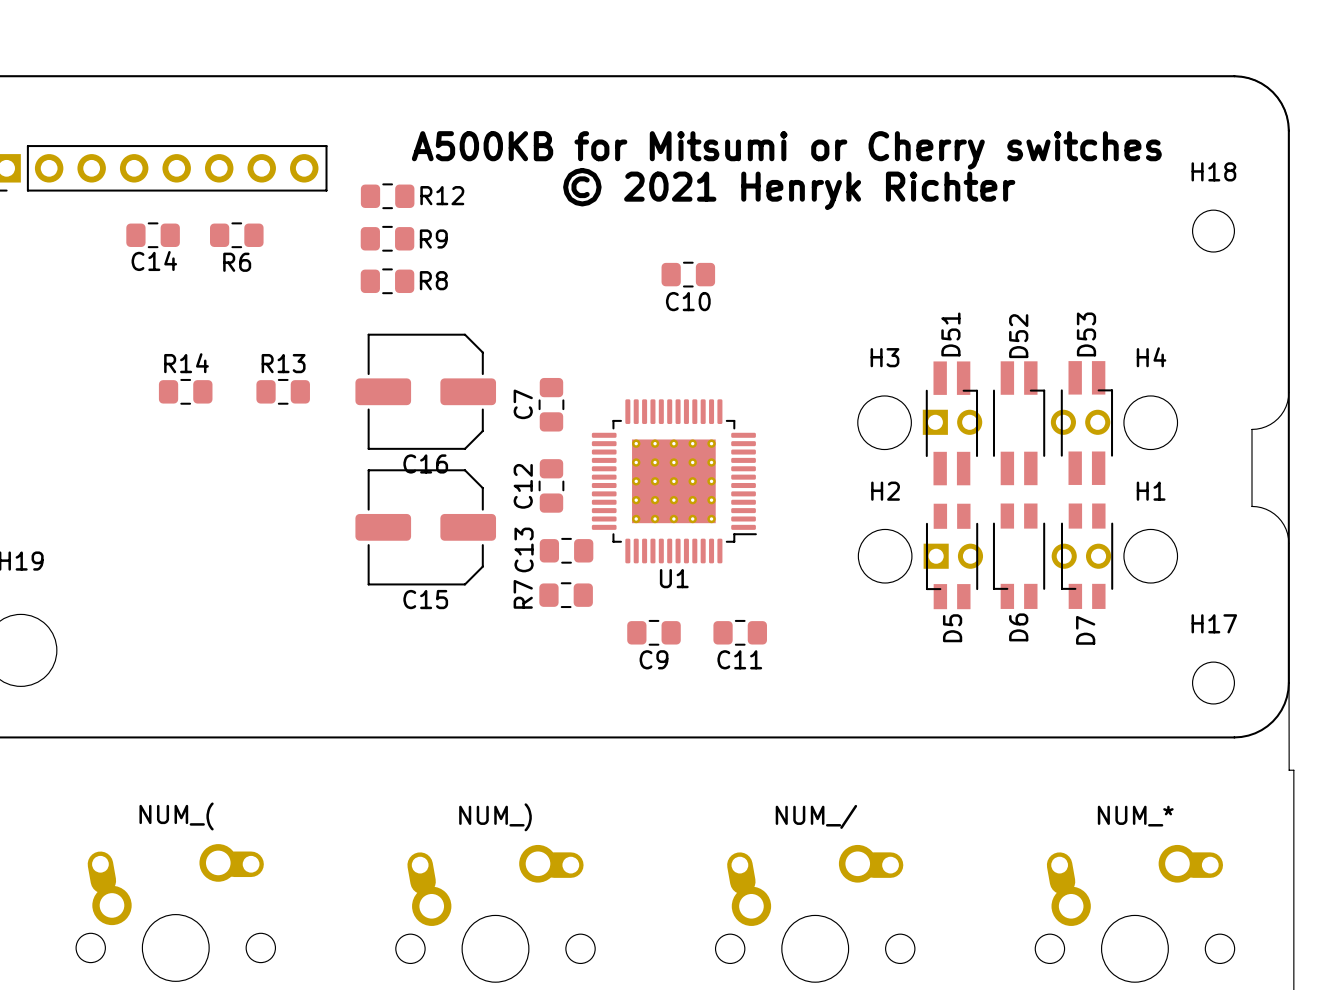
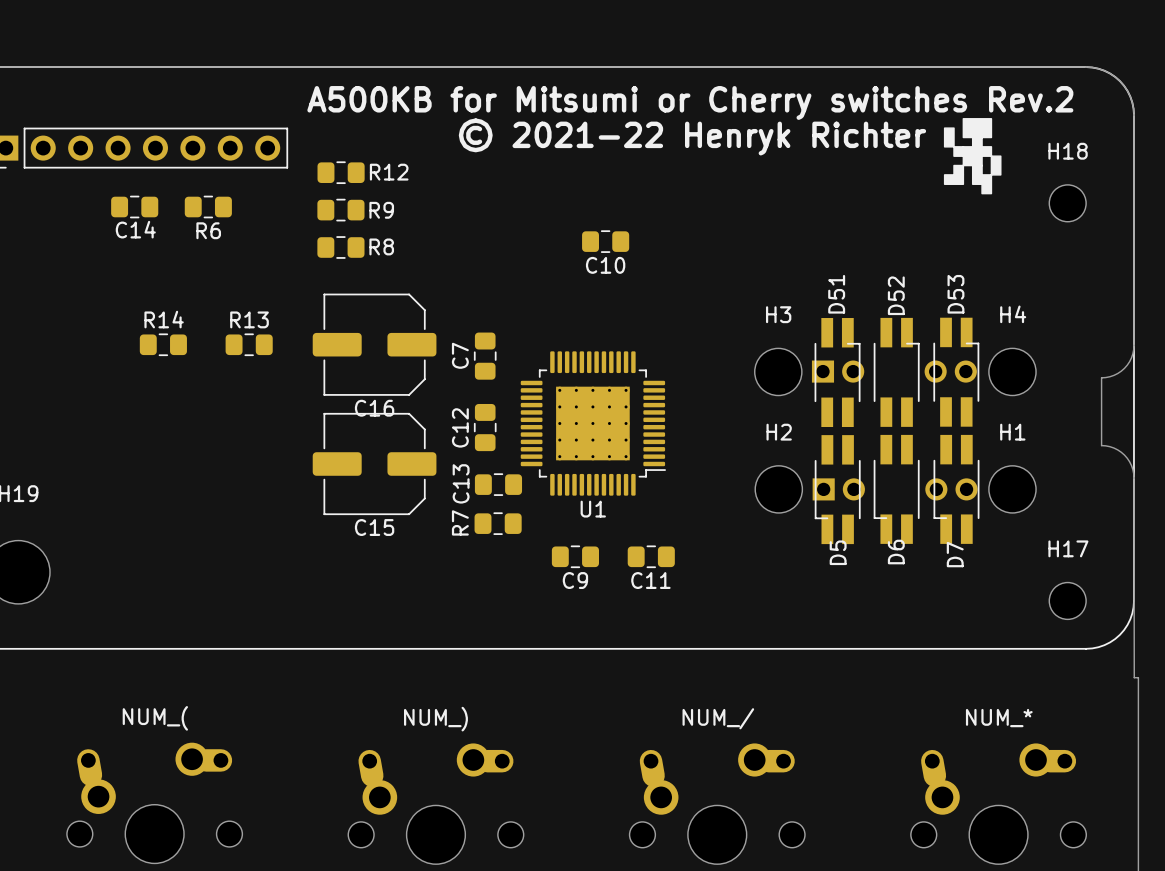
text: none -> A500KB for Mitsumi or Cherry switches Rev.2 (690, 102)
drawing: none -> [943, 118, 1002, 195]
text: A500KB for Mitsumi or Cherry switches (786, 150) -> © 2021-22 Henryk Richter (692, 136)
text: © 2021 Henryk Richter (789, 189) -> none
D5 footprint: [925, 503, 979, 610] -> [814, 435, 861, 545]
D6 footprint: [992, 503, 1046, 609] -> [873, 434, 920, 544]
D7 footprint: [1060, 503, 1114, 609] -> [933, 434, 980, 544]

